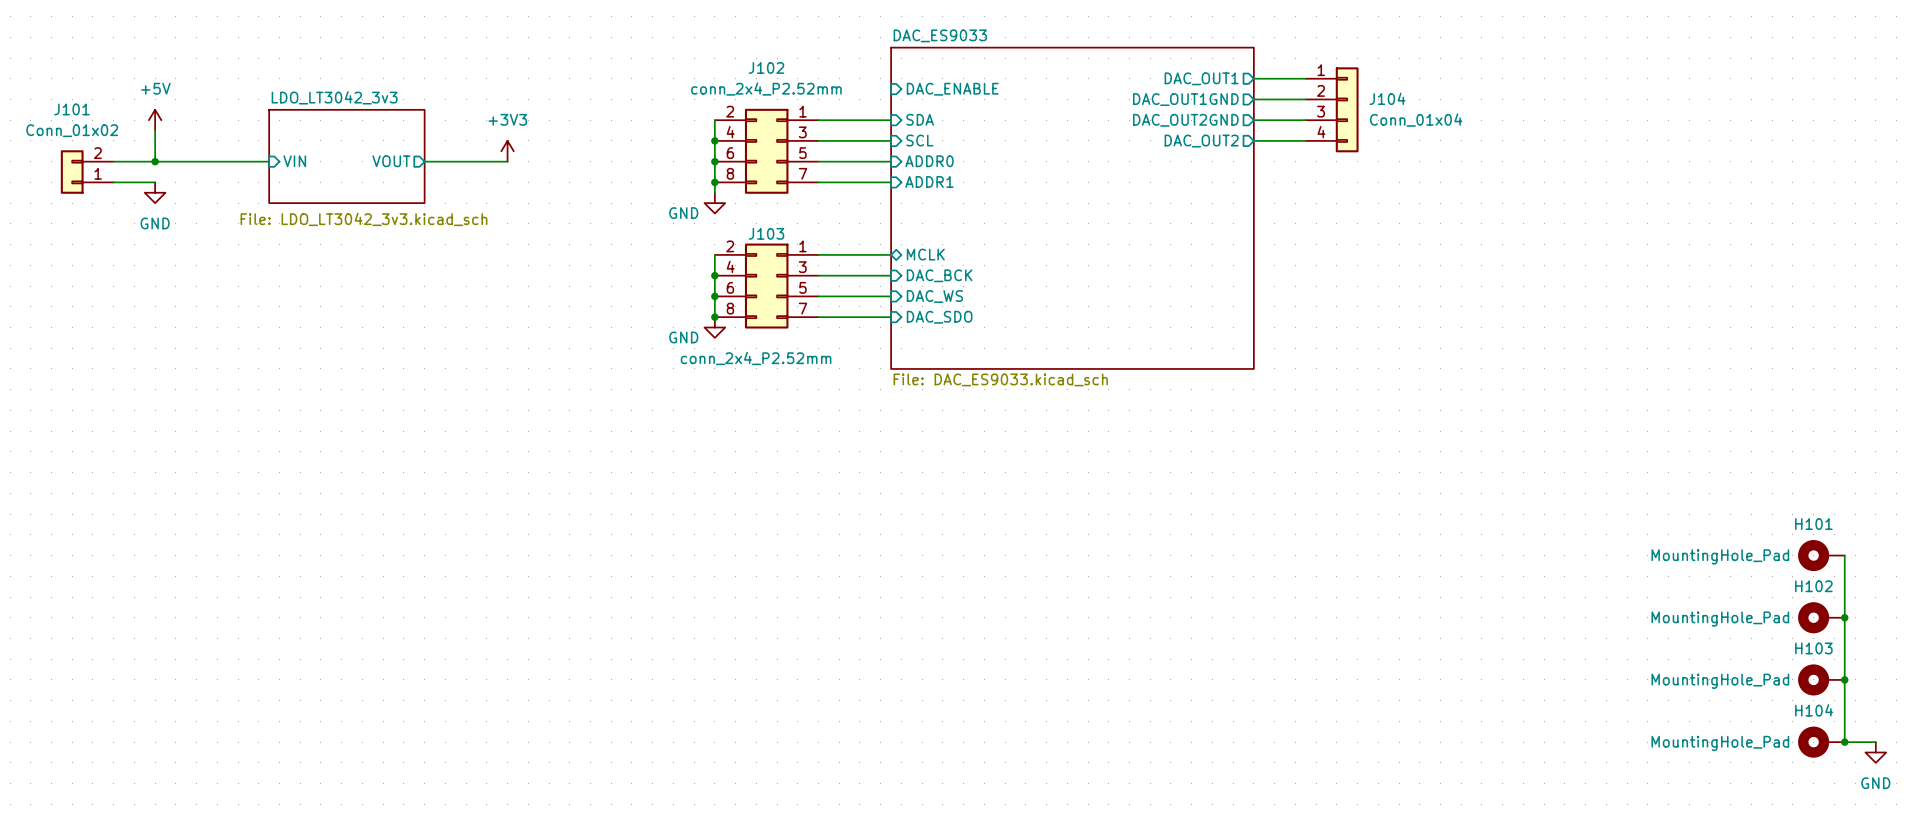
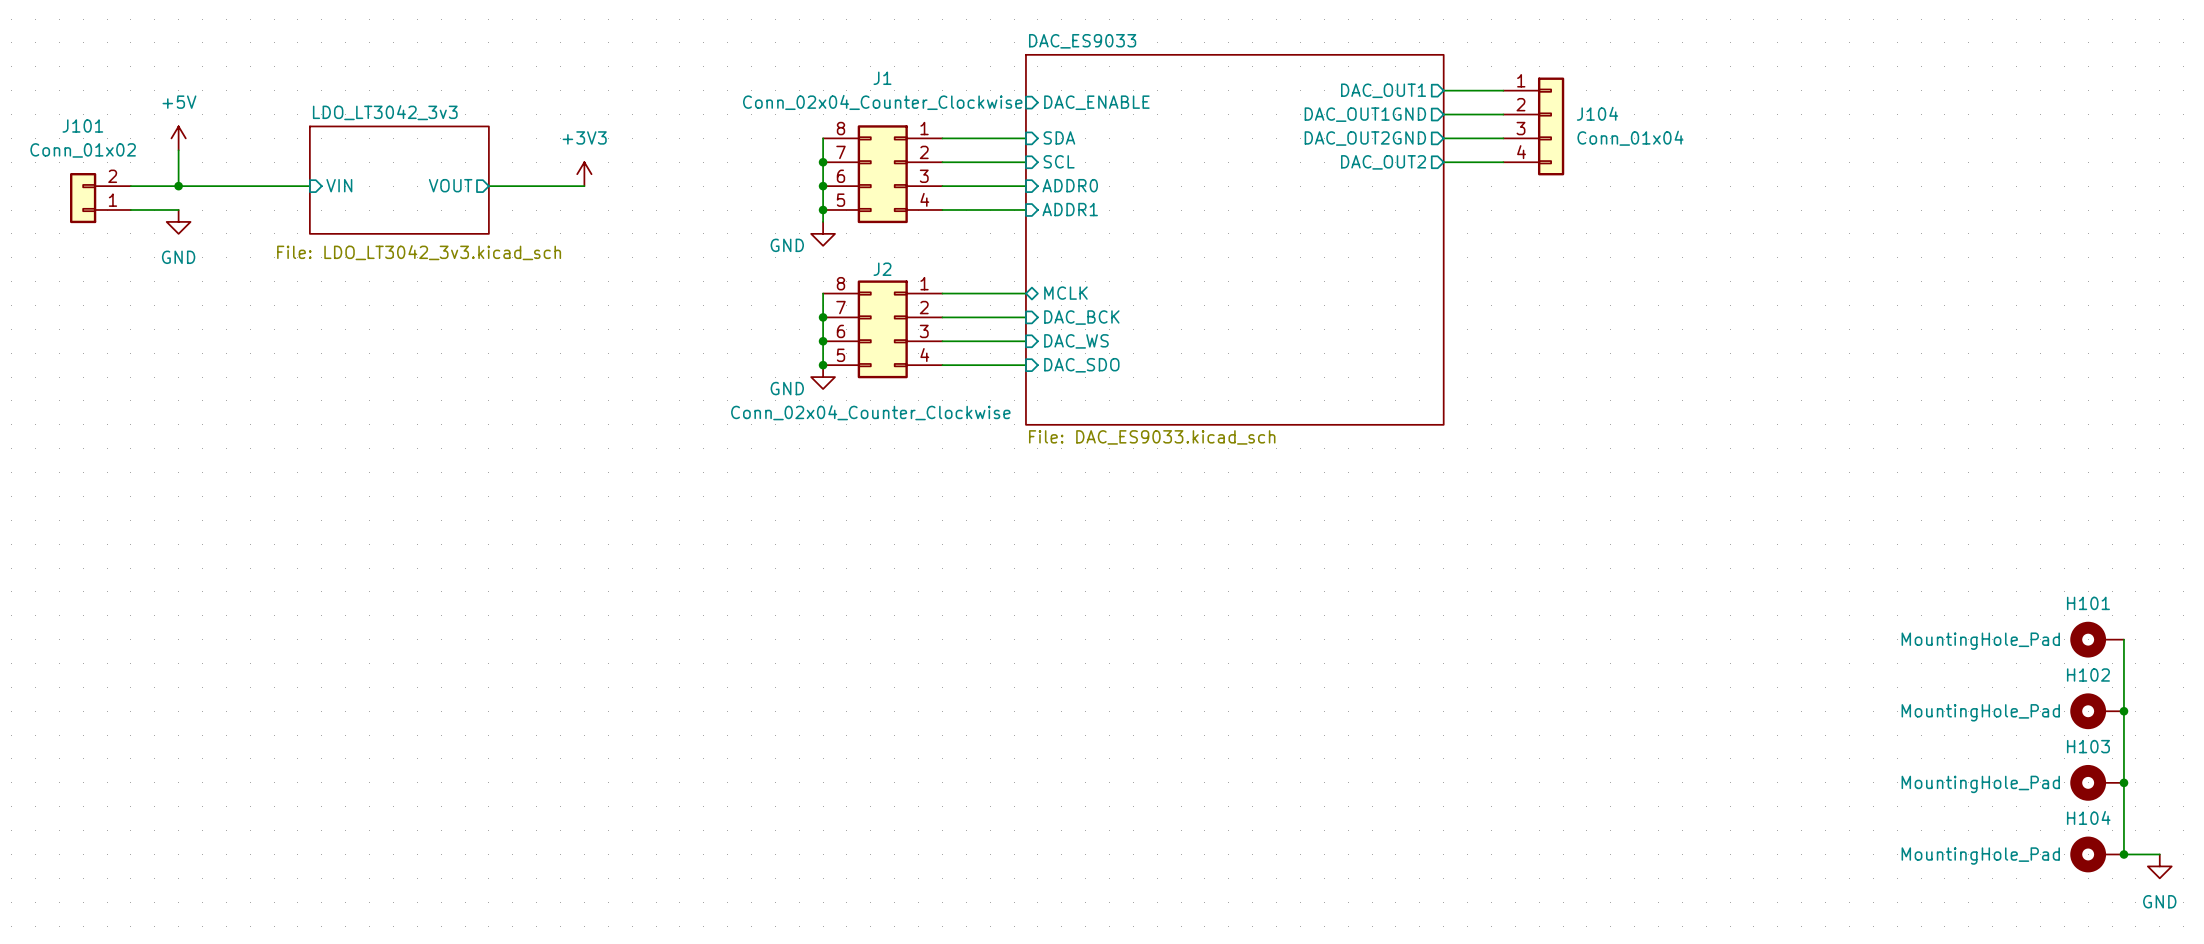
J102 name: J102 (766, 67) -> J1 (882, 78)
J102 value: conn_2x4_P2.52mm (766, 88) -> Conn_02x04_Counter_Clockwise (882, 102)
J102 pin number: 2 (730, 111) -> 8 (840, 128)
J102 pin number: 4 (730, 132) -> 7 (840, 152)
J102 pin number: 3 (802, 132) -> 2 (924, 152)
J102 pin number: 5 (802, 153) -> 3 (924, 176)
J102 pin number: 8 (730, 173) -> 5 (840, 200)
J102 pin number: 7 (802, 173) -> 4 (924, 199)
J103 name: J103 (766, 233) -> J2 (882, 269)
J103 pin number: 2 (730, 246) -> 8 (840, 283)
J103 pin number: 4 (730, 266) -> 7 (840, 307)
J103 pin number: 3 (802, 267) -> 2 (924, 307)
J103 pin number: 5 (802, 287) -> 3 (924, 331)
J103 pin number: 8 (730, 308) -> 5 (840, 355)
J103 pin number: 7 (802, 308) -> 4 (924, 355)
J103 value: conn_2x4_P2.52mm (756, 358) -> Conn_02x04_Counter_Clockwise (870, 412)

